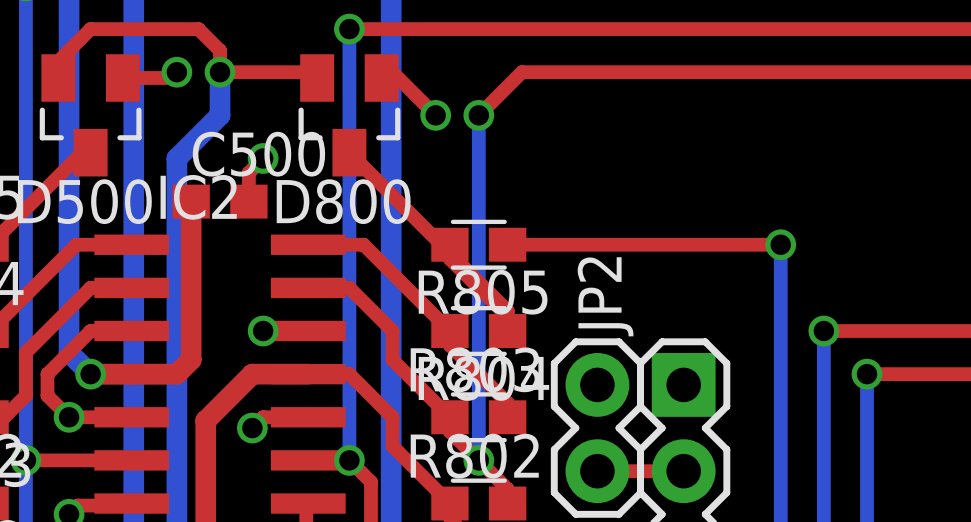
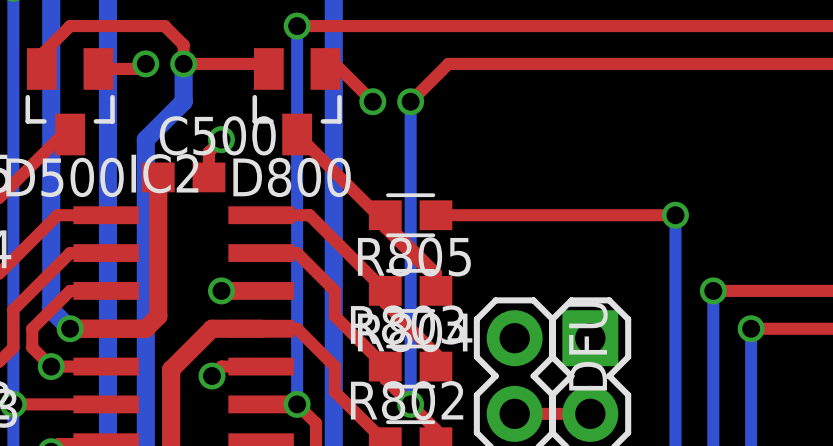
JP2 name: JP2 (605, 296) -> DFU (588, 346)

